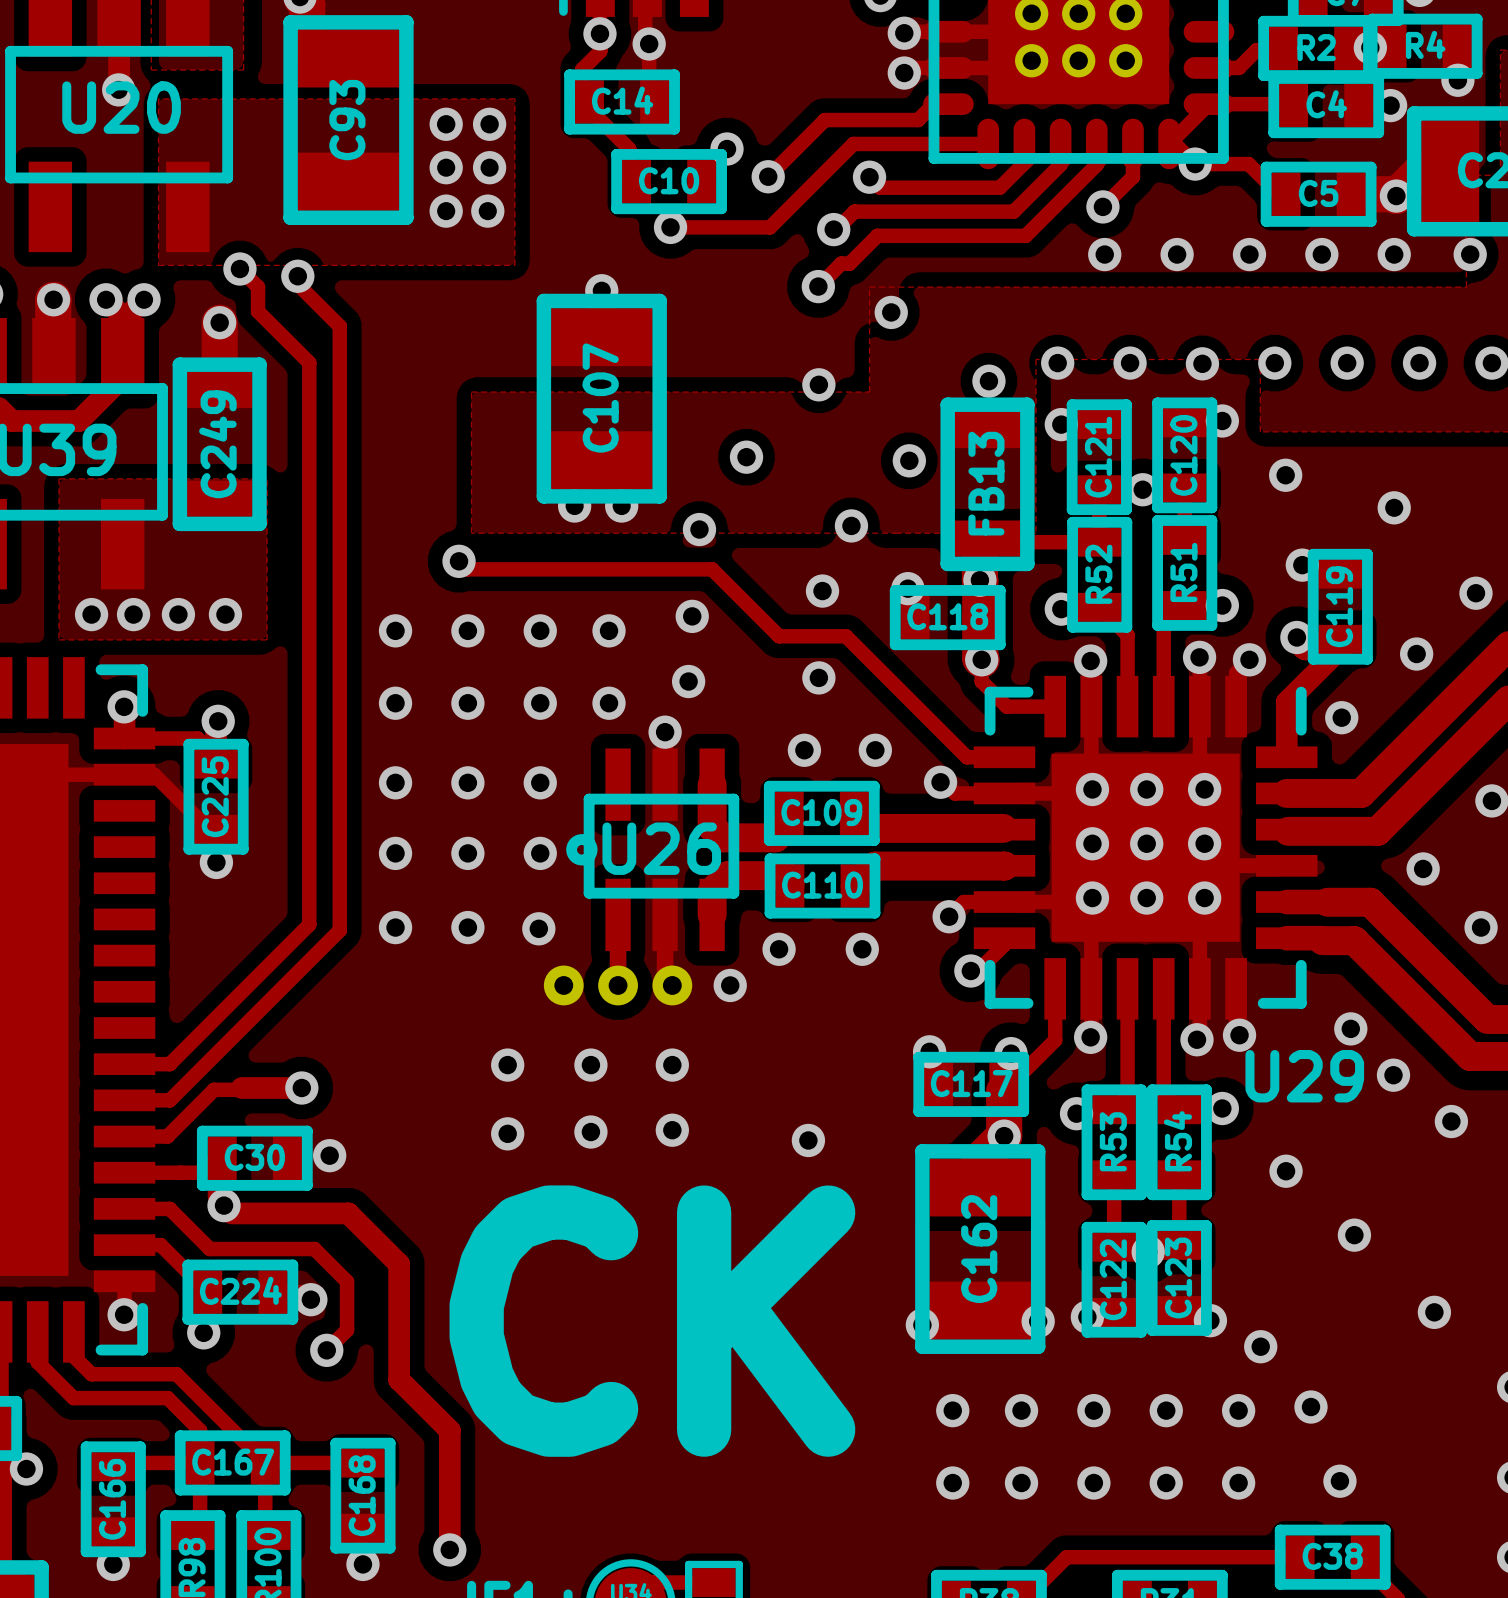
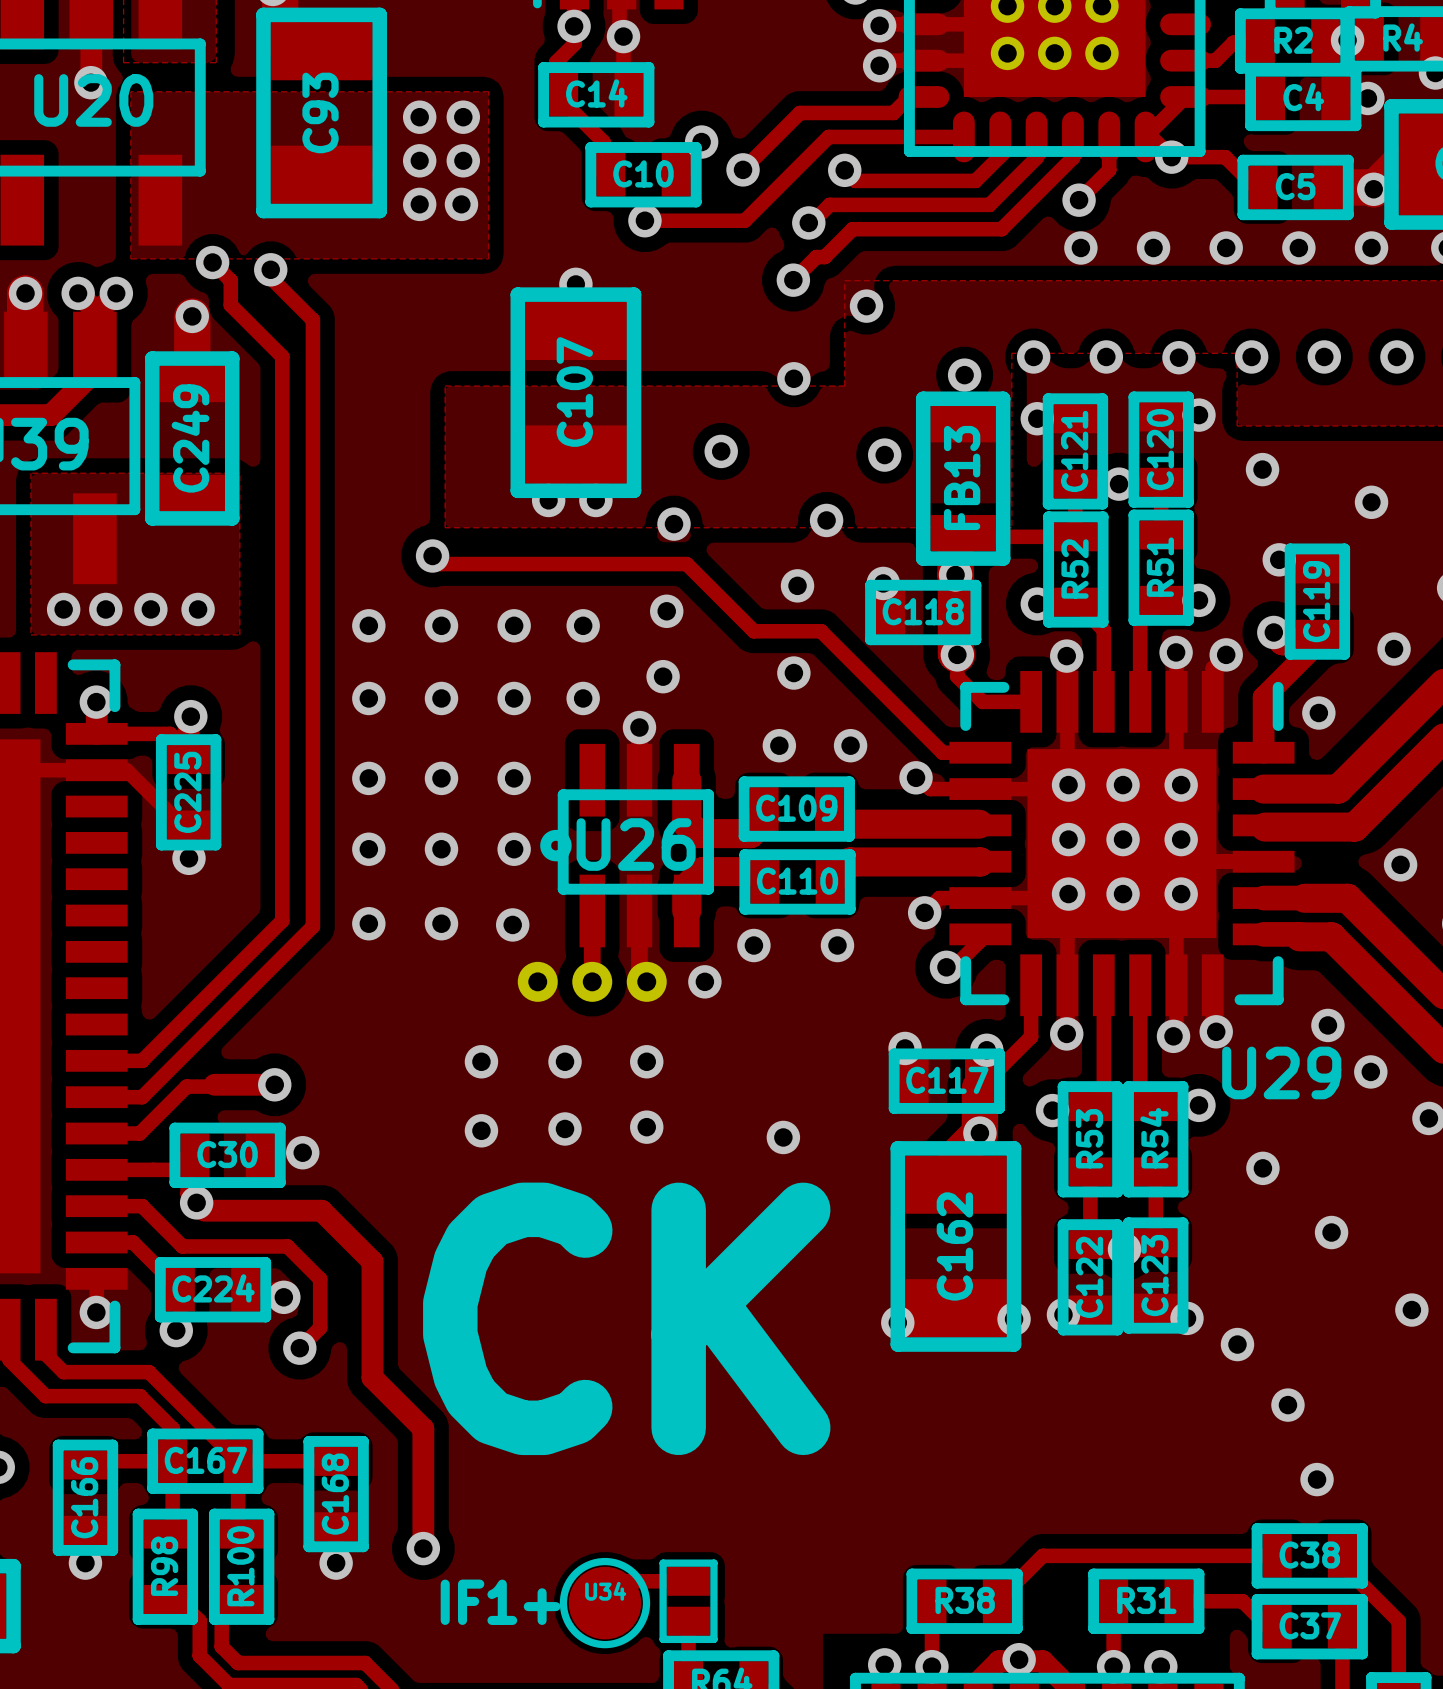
via: (952, 1410) -> none
via: (1021, 1410) -> none
via: (1093, 1410) -> none
via: (1166, 1410) -> none
via: (1238, 1410) -> none
via: (952, 1483) -> none
via: (1021, 1483) -> none
via: (1093, 1483) -> none
via: (1166, 1483) -> none
via: (1238, 1483) -> none

